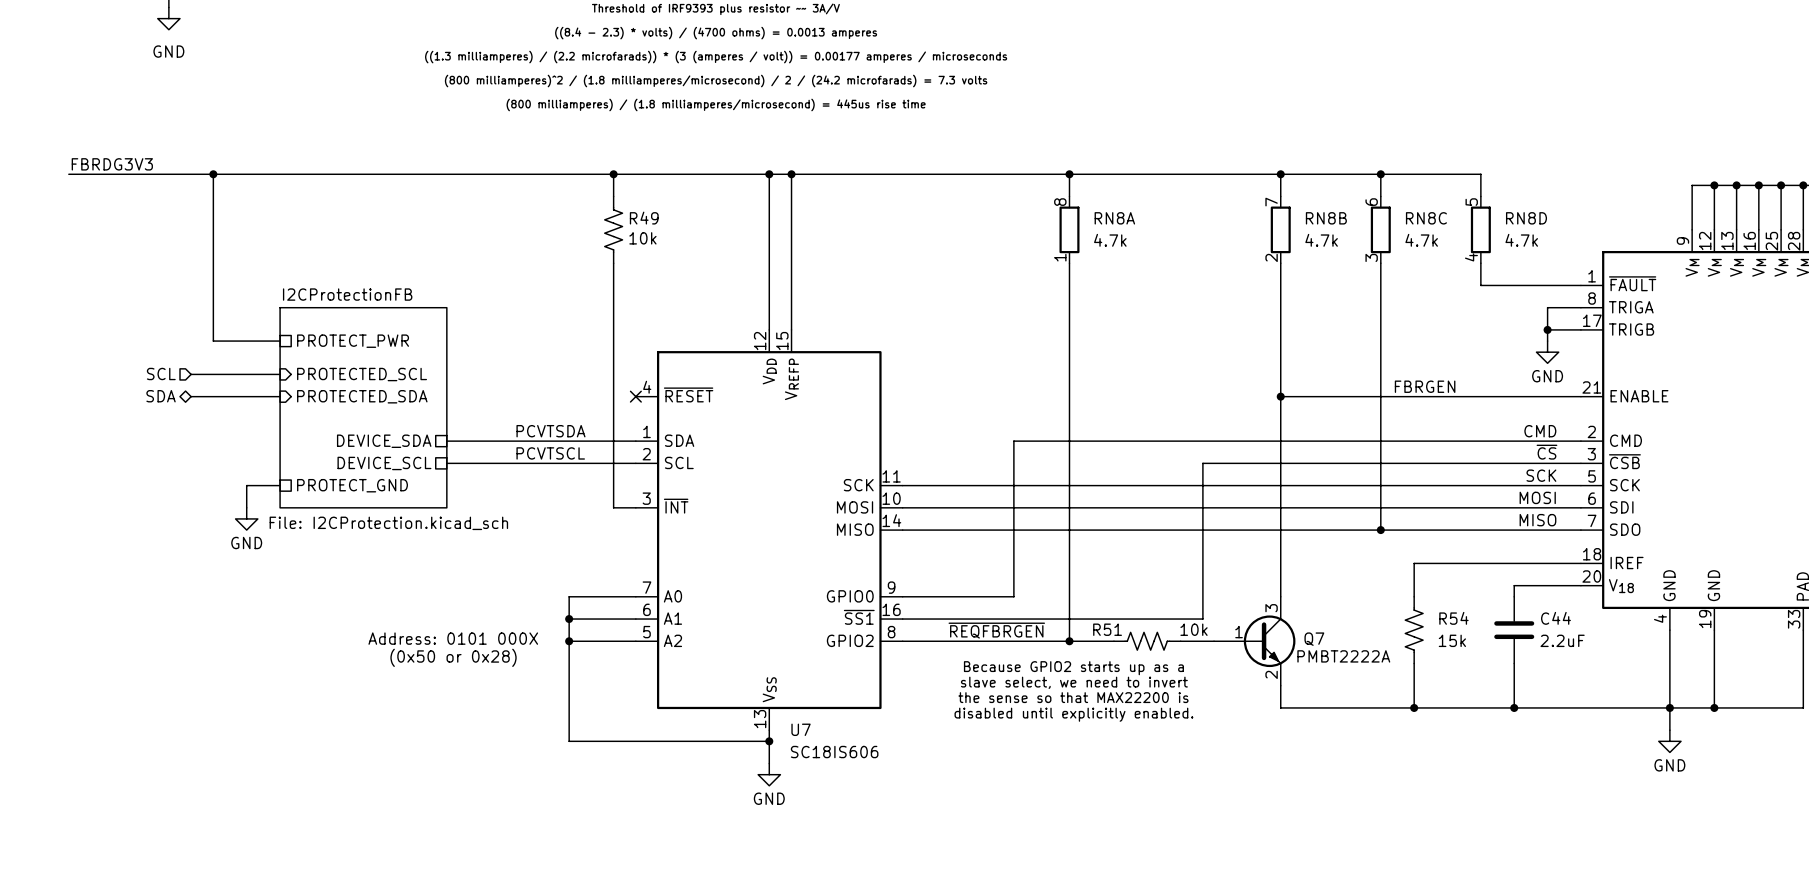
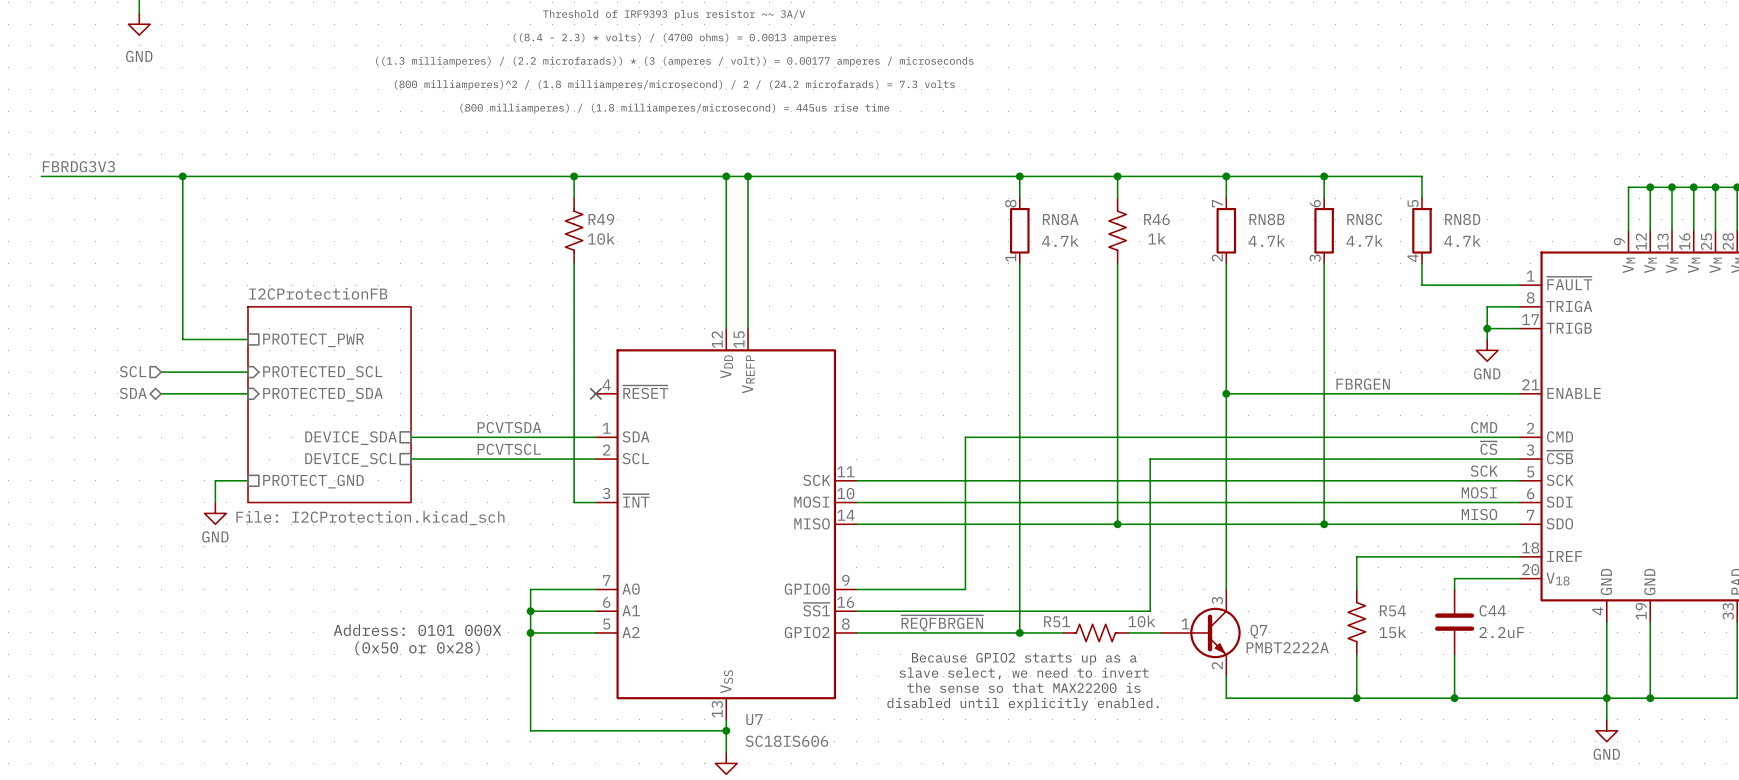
wire: none -> (1117, 176) (1117, 198)
junction: none -> (1117, 176)
R46: none -> 1k (1117, 230)
wire: none -> (1117, 263) (1117, 524)
junction: none -> (1117, 524)

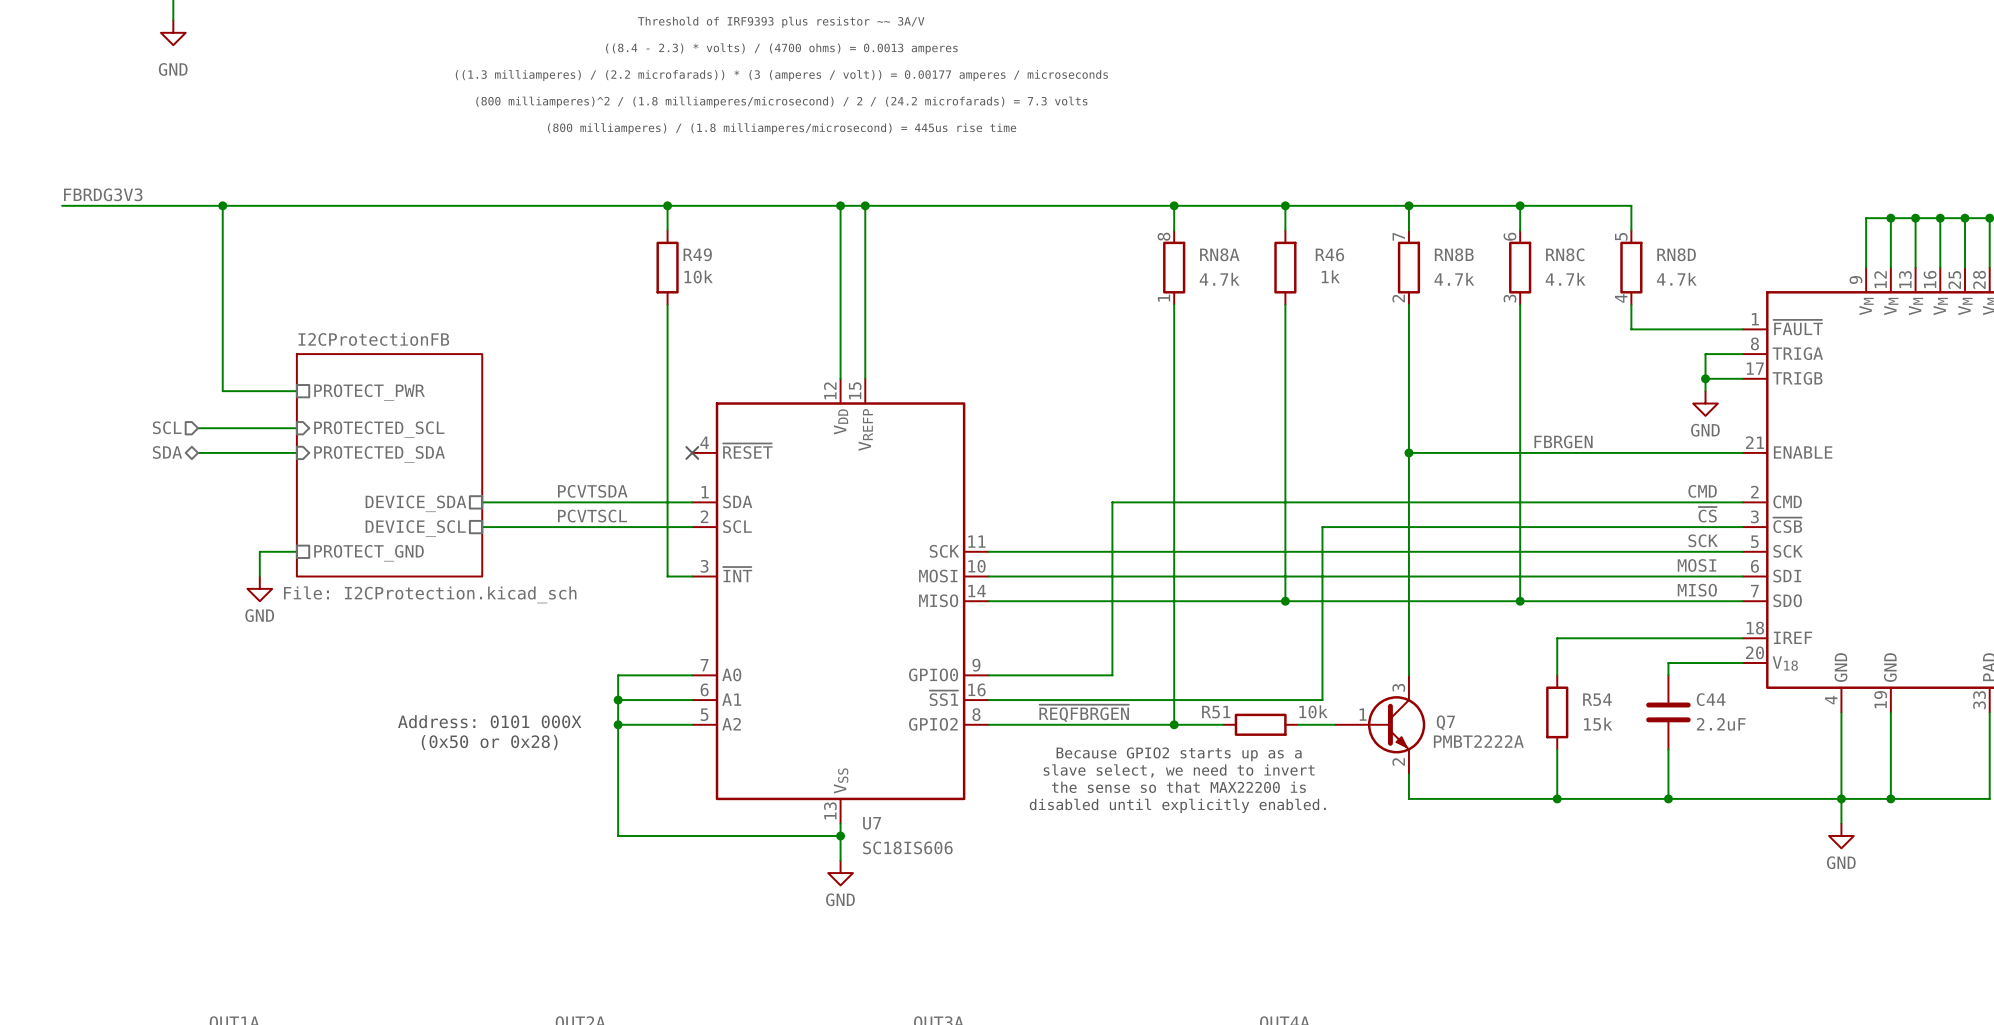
R49 symbol: [565, 198, 583, 264] -> [656, 230, 679, 305]
R46 symbol: [1108, 198, 1127, 264] -> [1274, 230, 1297, 305]
R54 symbol: [1348, 589, 1366, 655] -> [1546, 675, 1569, 750]
R51 symbol: [1063, 624, 1129, 642] -> [1223, 713, 1298, 736]

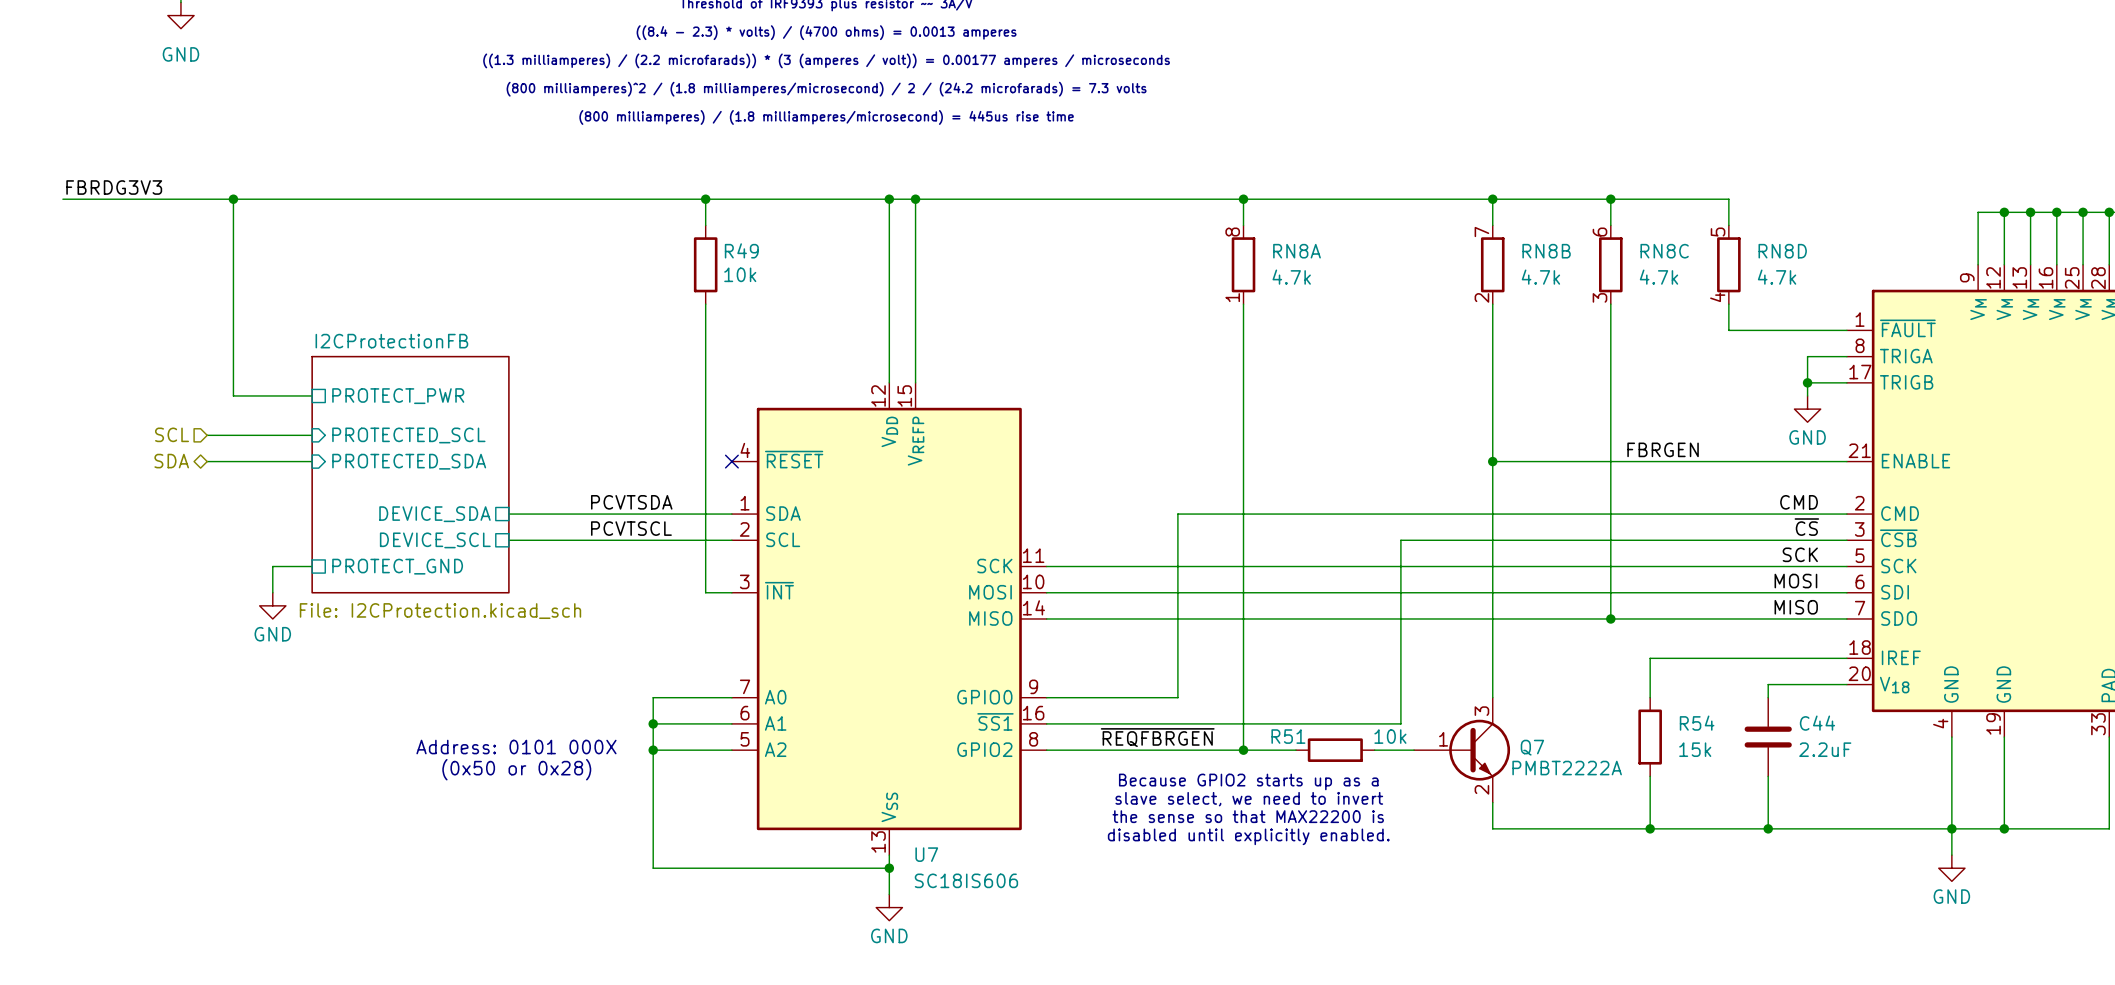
wire: (1285, 205) (1285, 230) -> none
junction: (1285, 205) -> none
R46: 1k (1285, 267) -> none
wire: (1285, 304) (1285, 601) -> none
junction: (1285, 601) -> none

